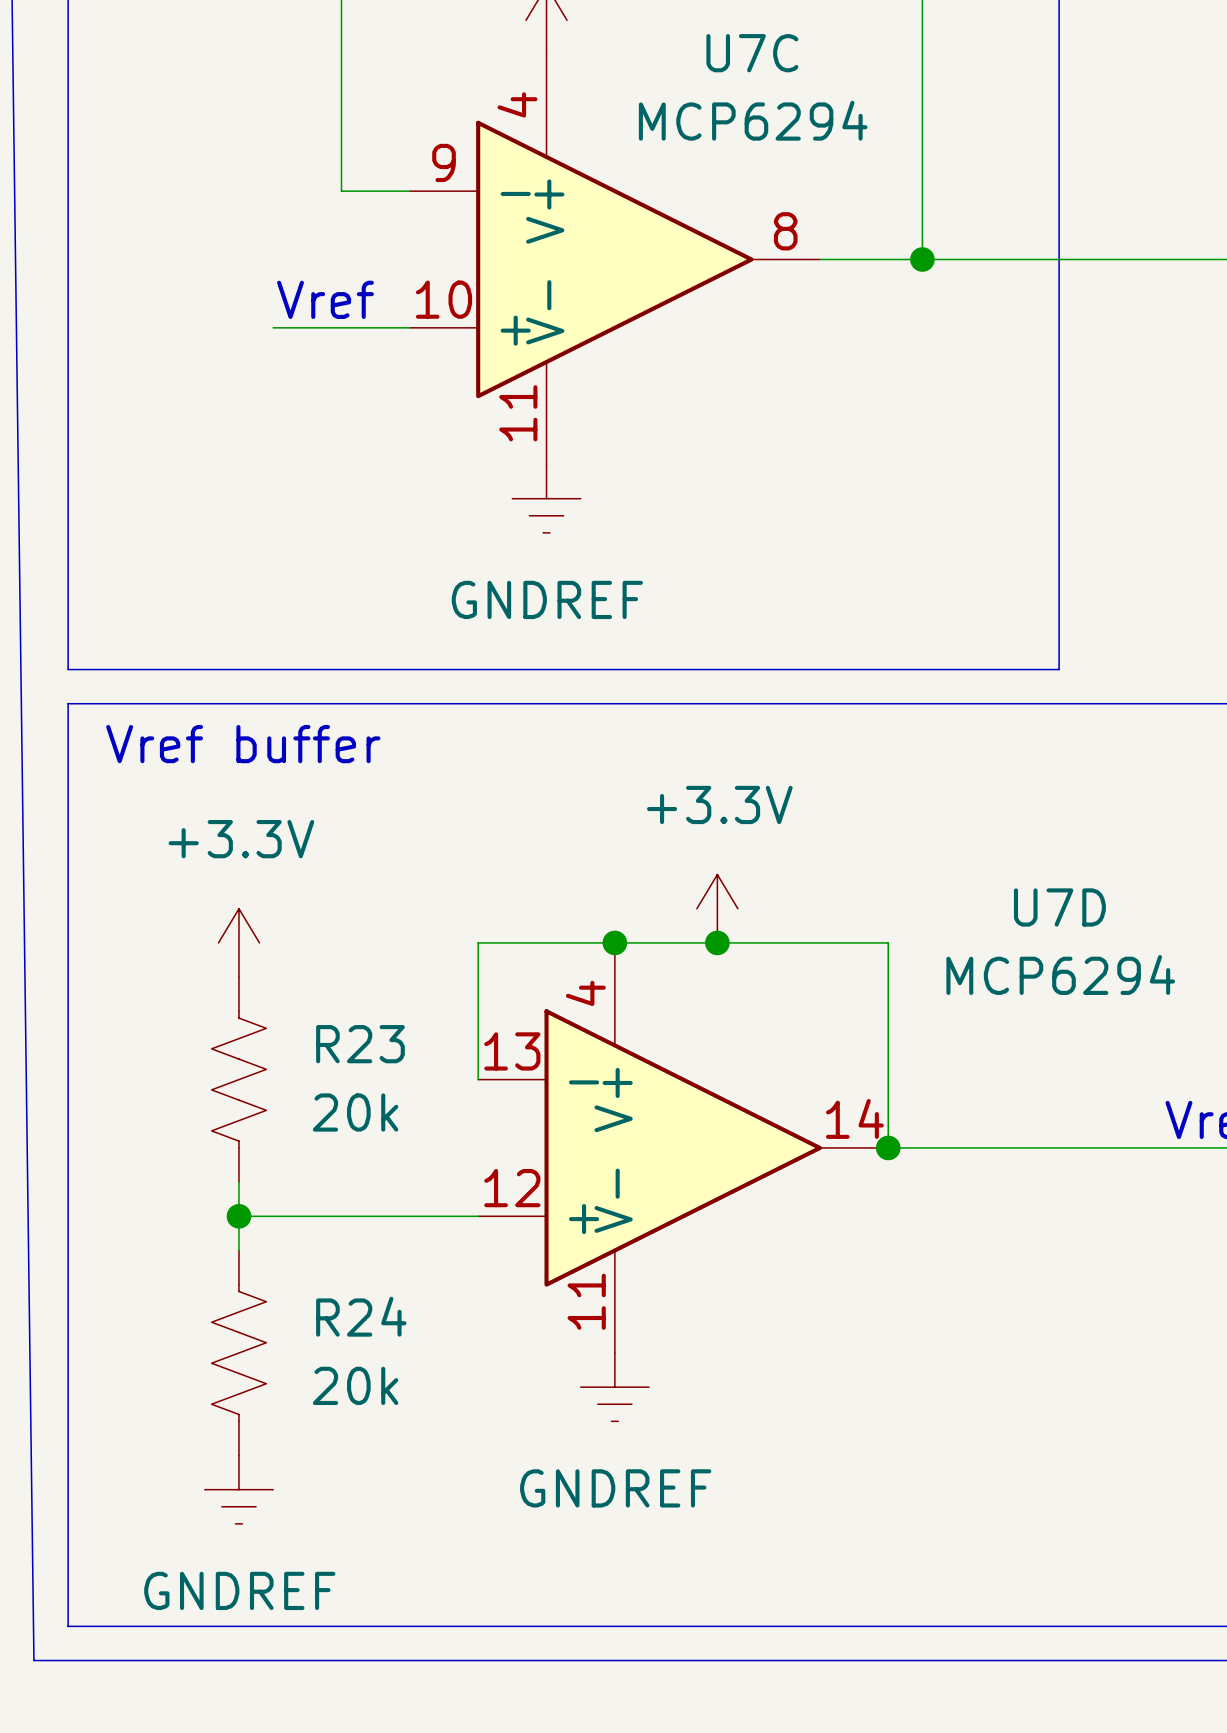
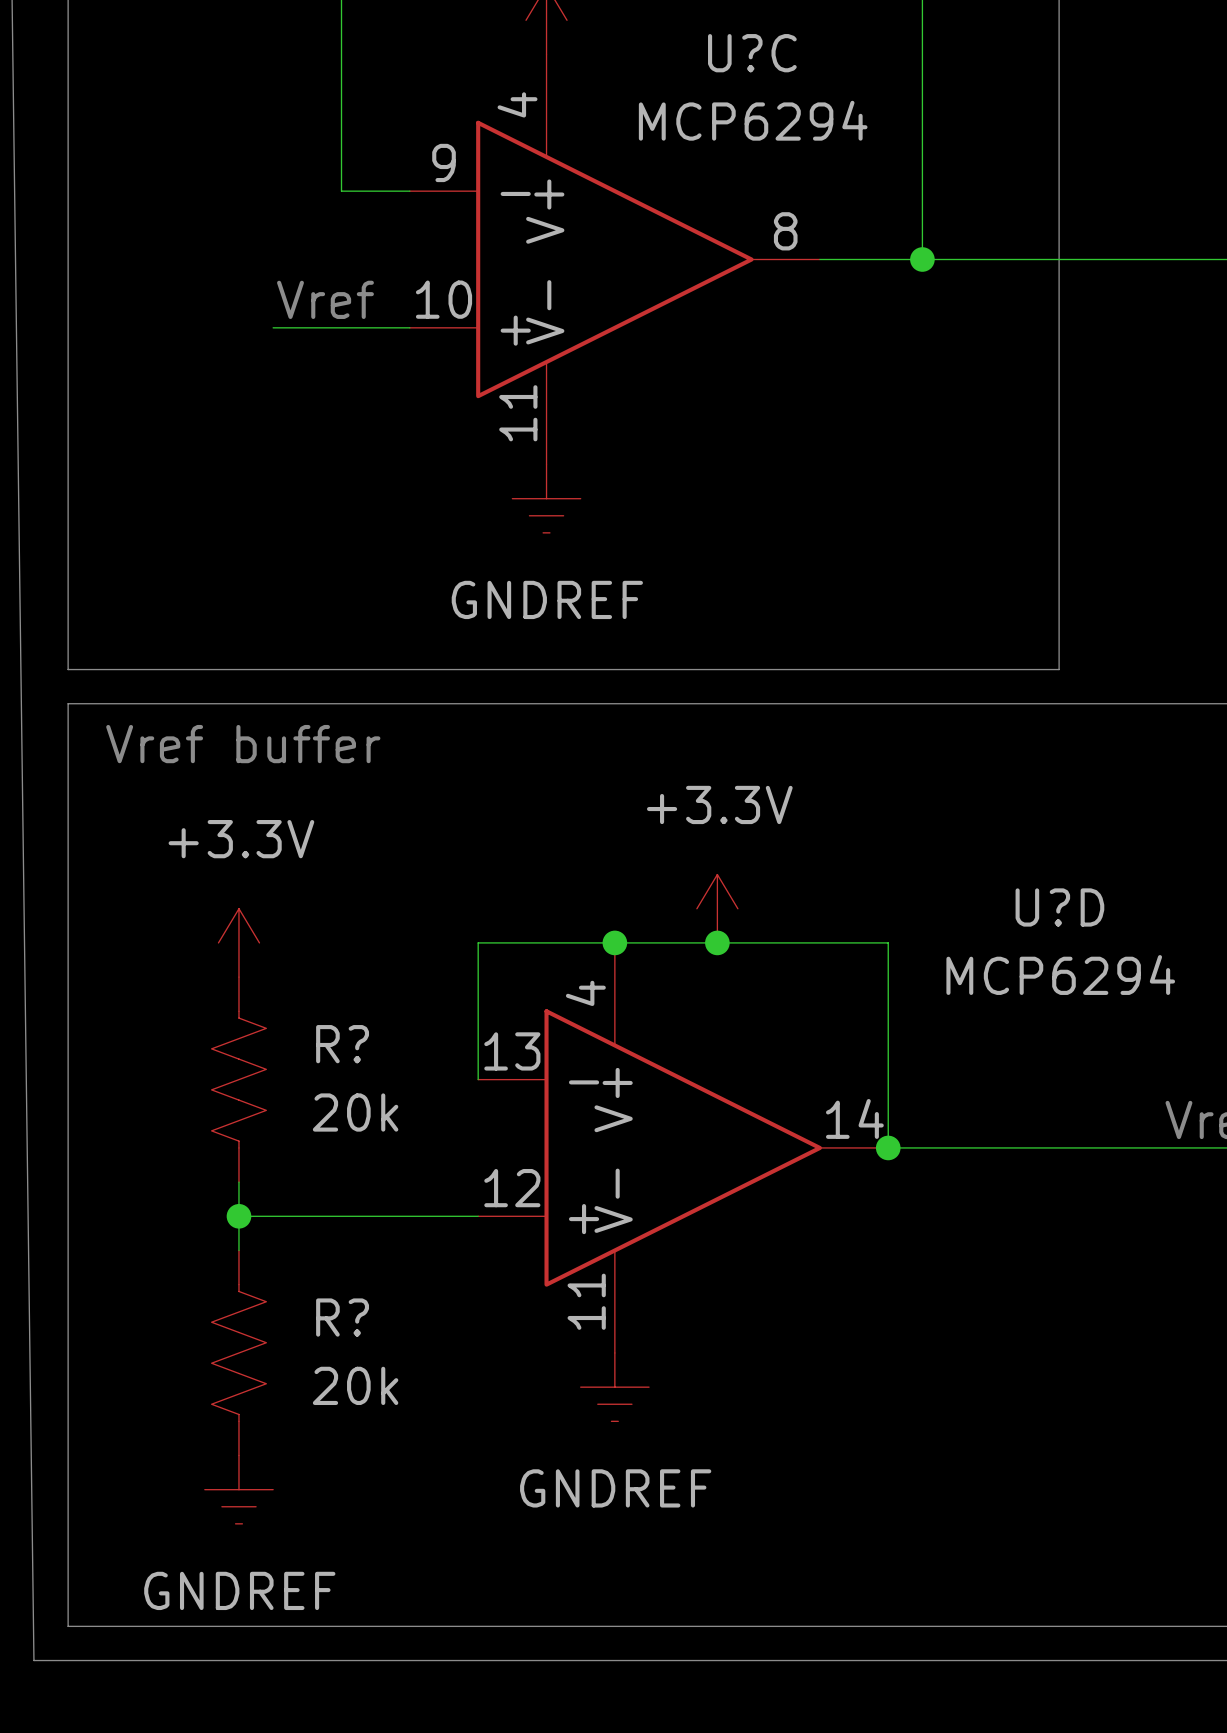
U7C name: U7C (752, 53) -> U?C (752, 53)
U7D name: U7D (1059, 907) -> U?D (1059, 907)
R23 name: R23 (360, 1044) -> R? (342, 1044)
R24 name: R24 (361, 1316) -> R? (342, 1317)

